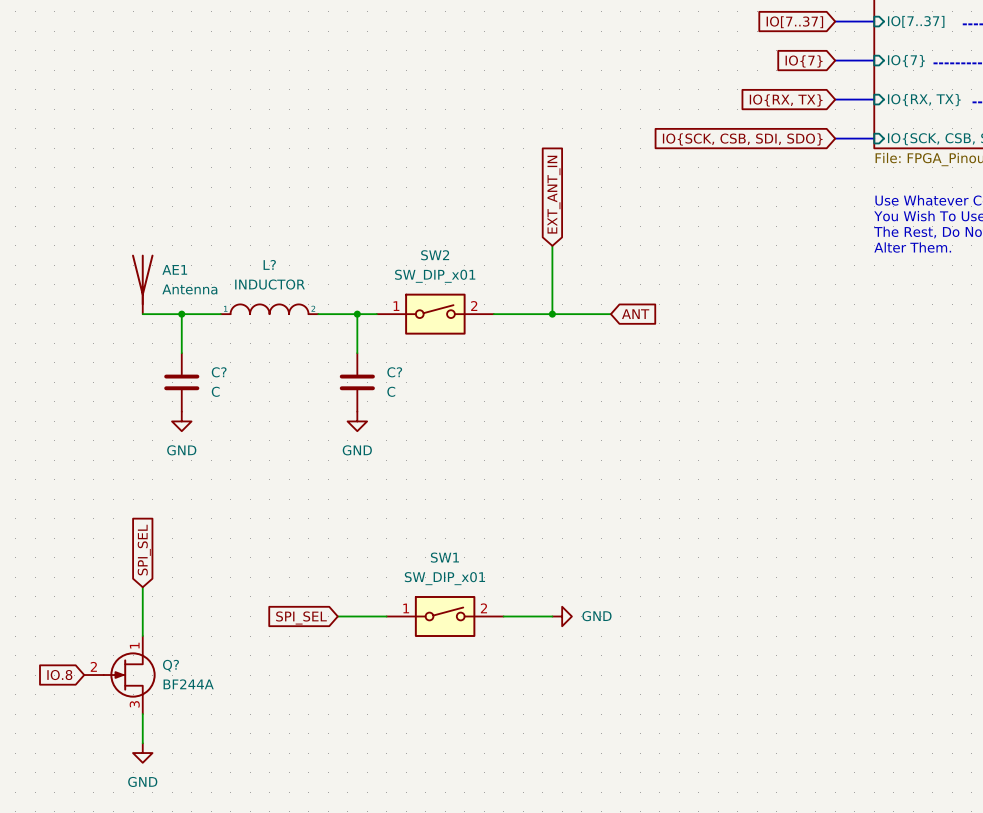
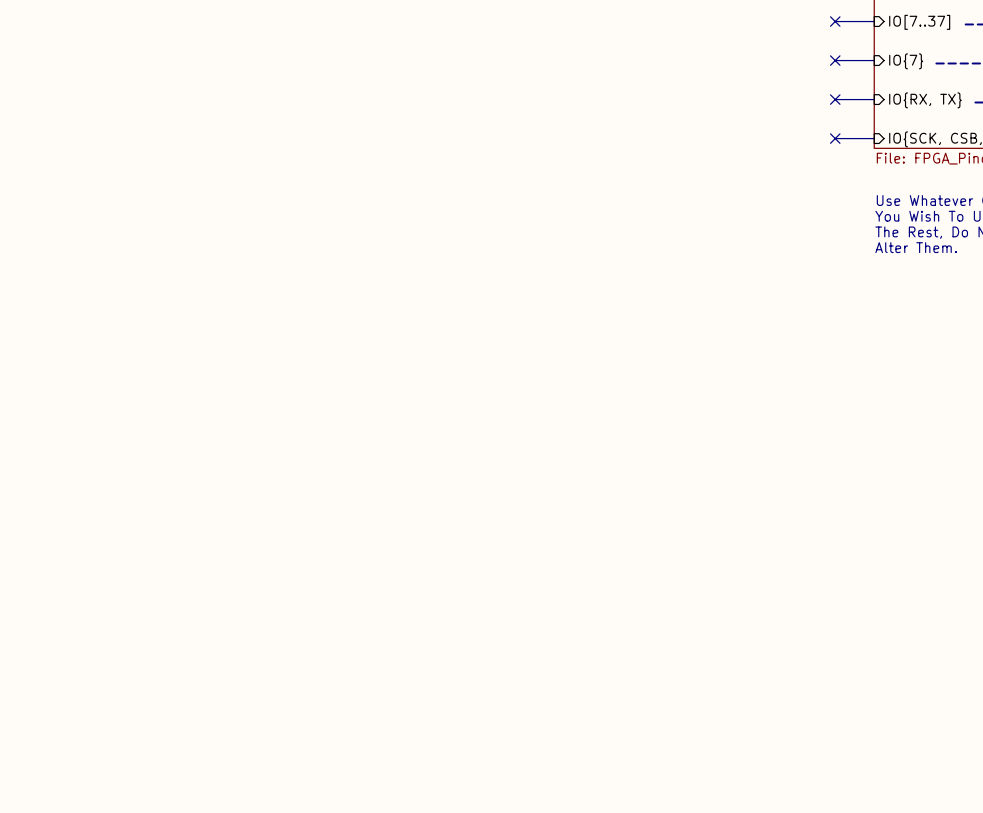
no-connect mark: none -> (835, 21)
global label: IO[7..37] (794, 22) -> none
no-connect mark: none -> (835, 60)
global label: IO{7} (804, 61) -> none
no-connect mark: none -> (835, 99)
global label: IO{RX, TX} (786, 100) -> none
no-connect mark: none -> (835, 138)
global label: IO{SCK, CSB, SDI, SDO} (742, 139) -> none
global label: EXT_ANT_IN (553, 194) -> none
wire: (552, 245) (552, 314) -> none
AE1: Antenna (142, 284) -> none
L?: INDUCTOR (269, 309) -> none
wire: (142, 314) (220, 314) -> none
wire: (181, 314) (181, 353) -> none
junction: (181, 314) -> none
wire: (318, 314) (376, 314) -> none
wire: (357, 314) (357, 353) -> none
junction: (357, 314) -> none
SW2: SW_DIP_x01 (435, 314) -> none
wire: (493, 314) (610, 314) -> none
junction: (552, 314) -> none
global label: ANT (635, 314) -> none
C?: C (181, 382) -> none
C?: C (357, 382) -> none
power symbol: GND (181, 421) -> none
power symbol: GND (357, 421) -> none
global label: SPI_SEL (144, 550) -> none
wire: (142, 587) (142, 636) -> none
wire: (337, 616) (386, 616) -> none
SW1: SW_DIP_x01 (445, 616) -> none
wire: (503, 616) (552, 616) -> none
power symbol: GND (562, 616) -> none
global label: SPI_SEL (301, 617) -> none
global label: IO.8 (59, 675) -> none
Q?: BF244A (119, 675) -> none
wire: (142, 714) (142, 743) -> none
power symbol: GND (142, 753) -> none

